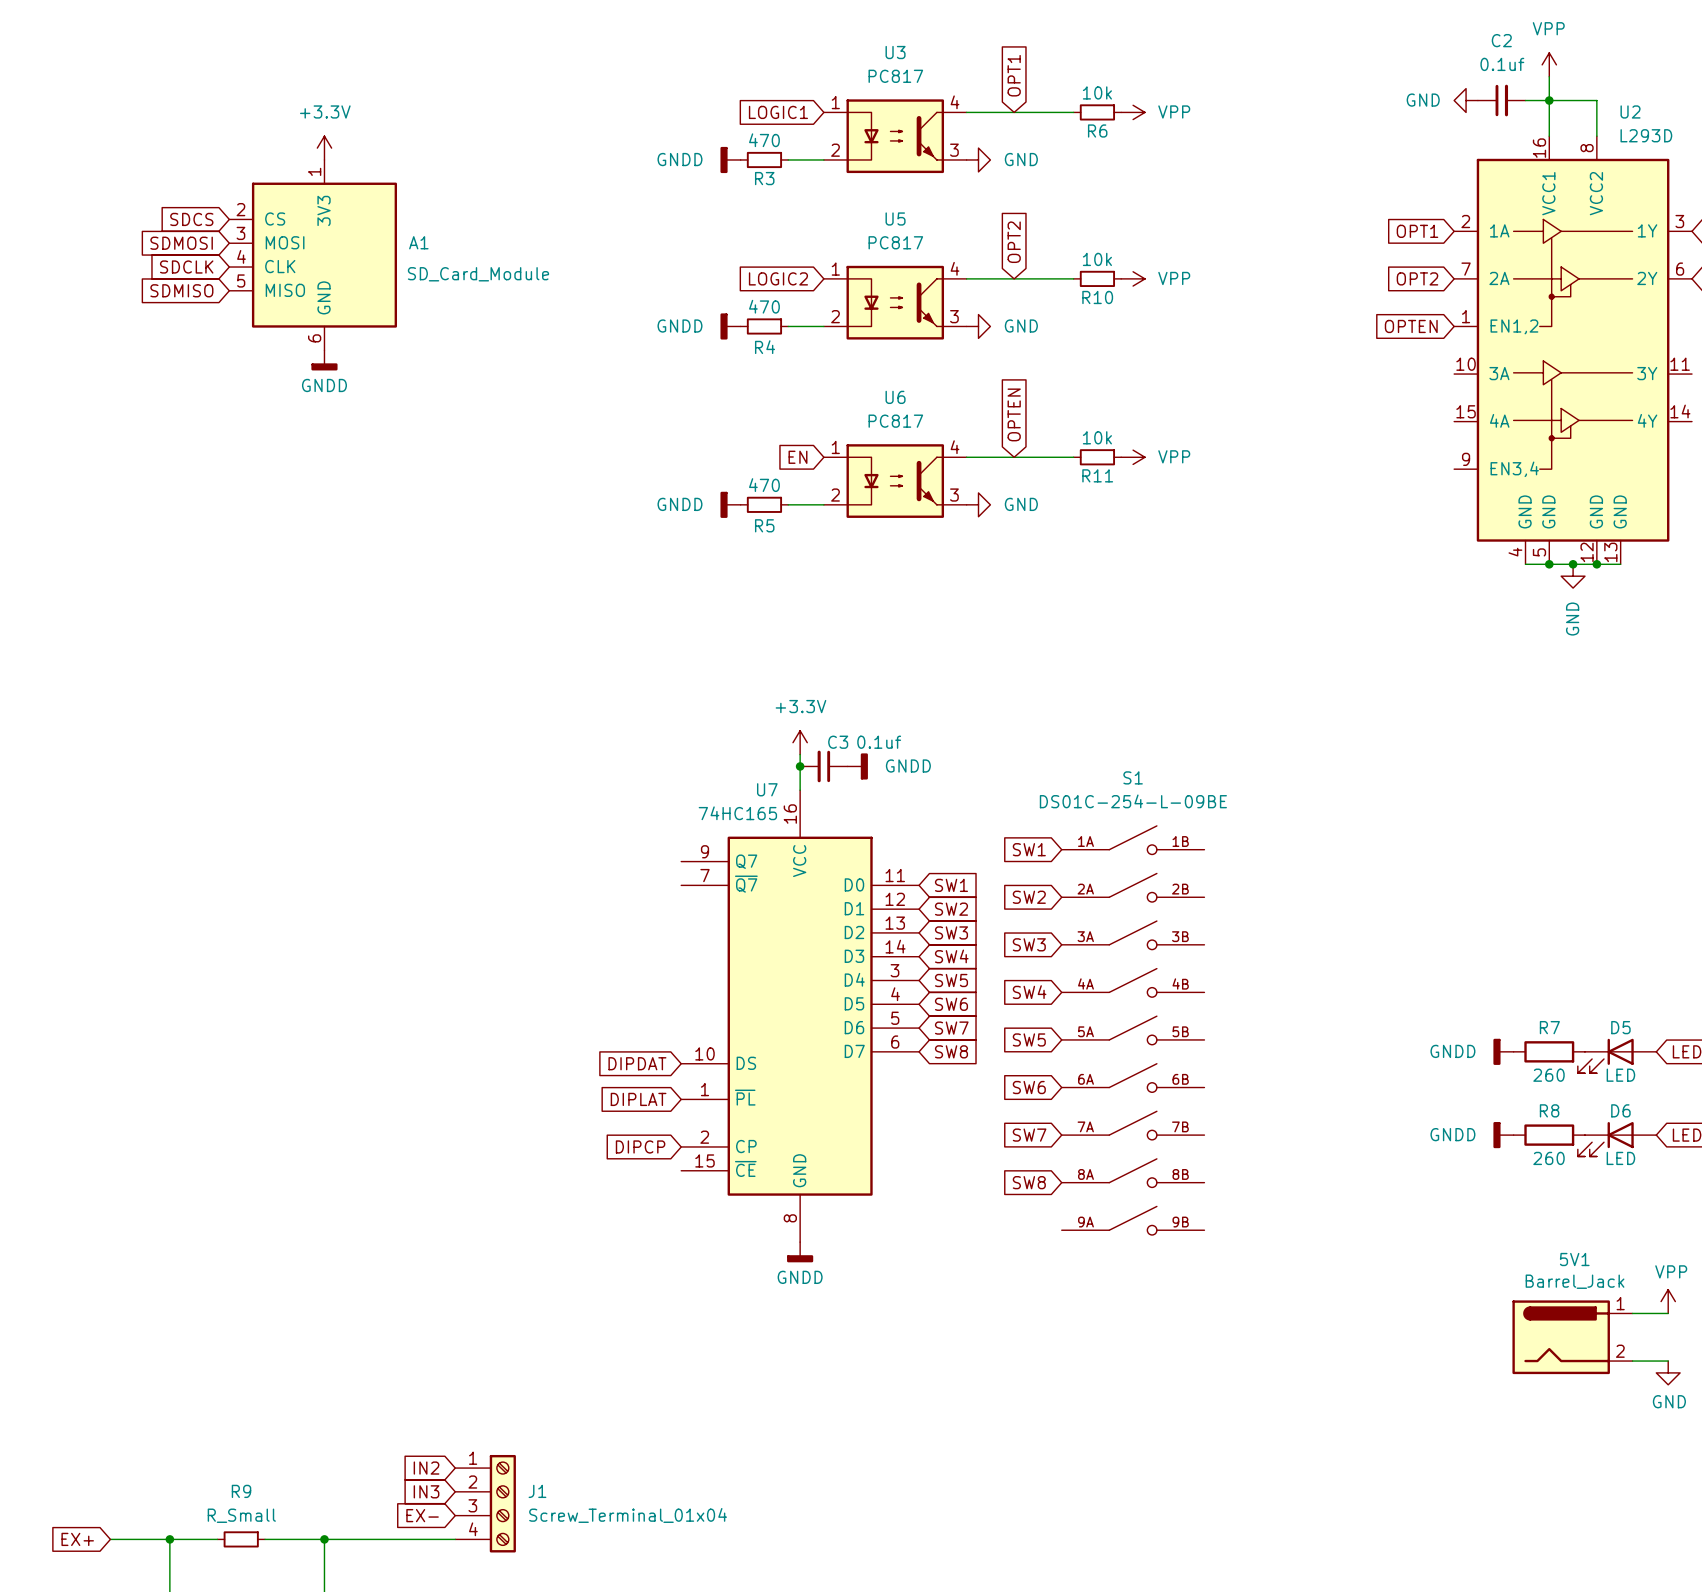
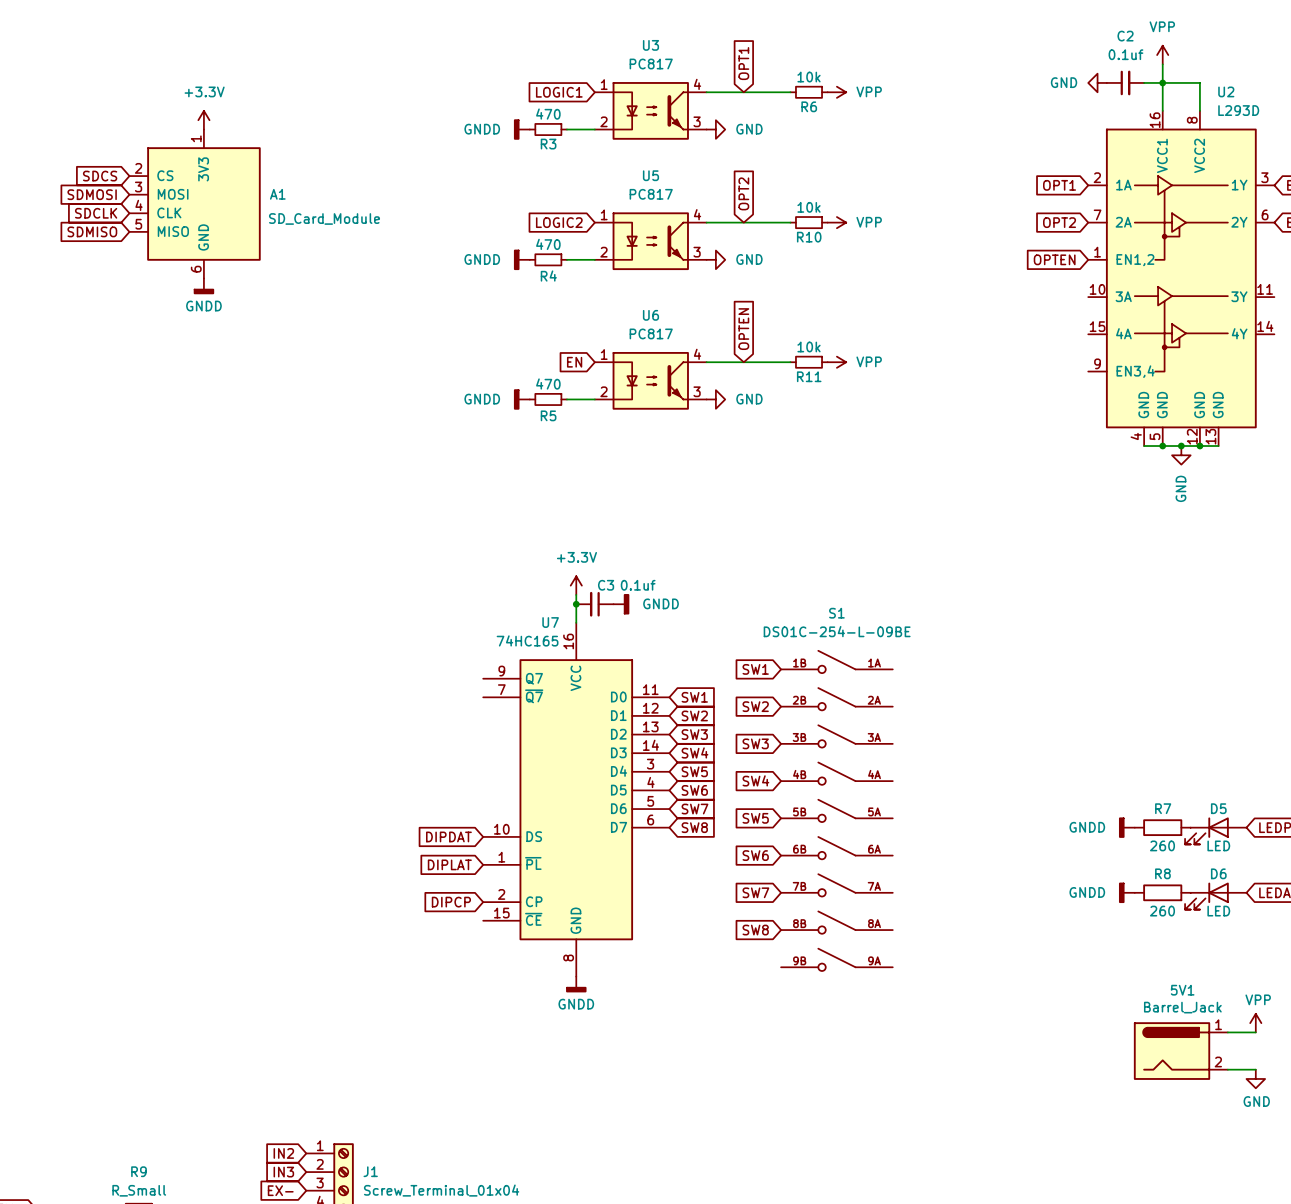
S1 flip: as is (1133, 1030) -> left-right (836, 810)

